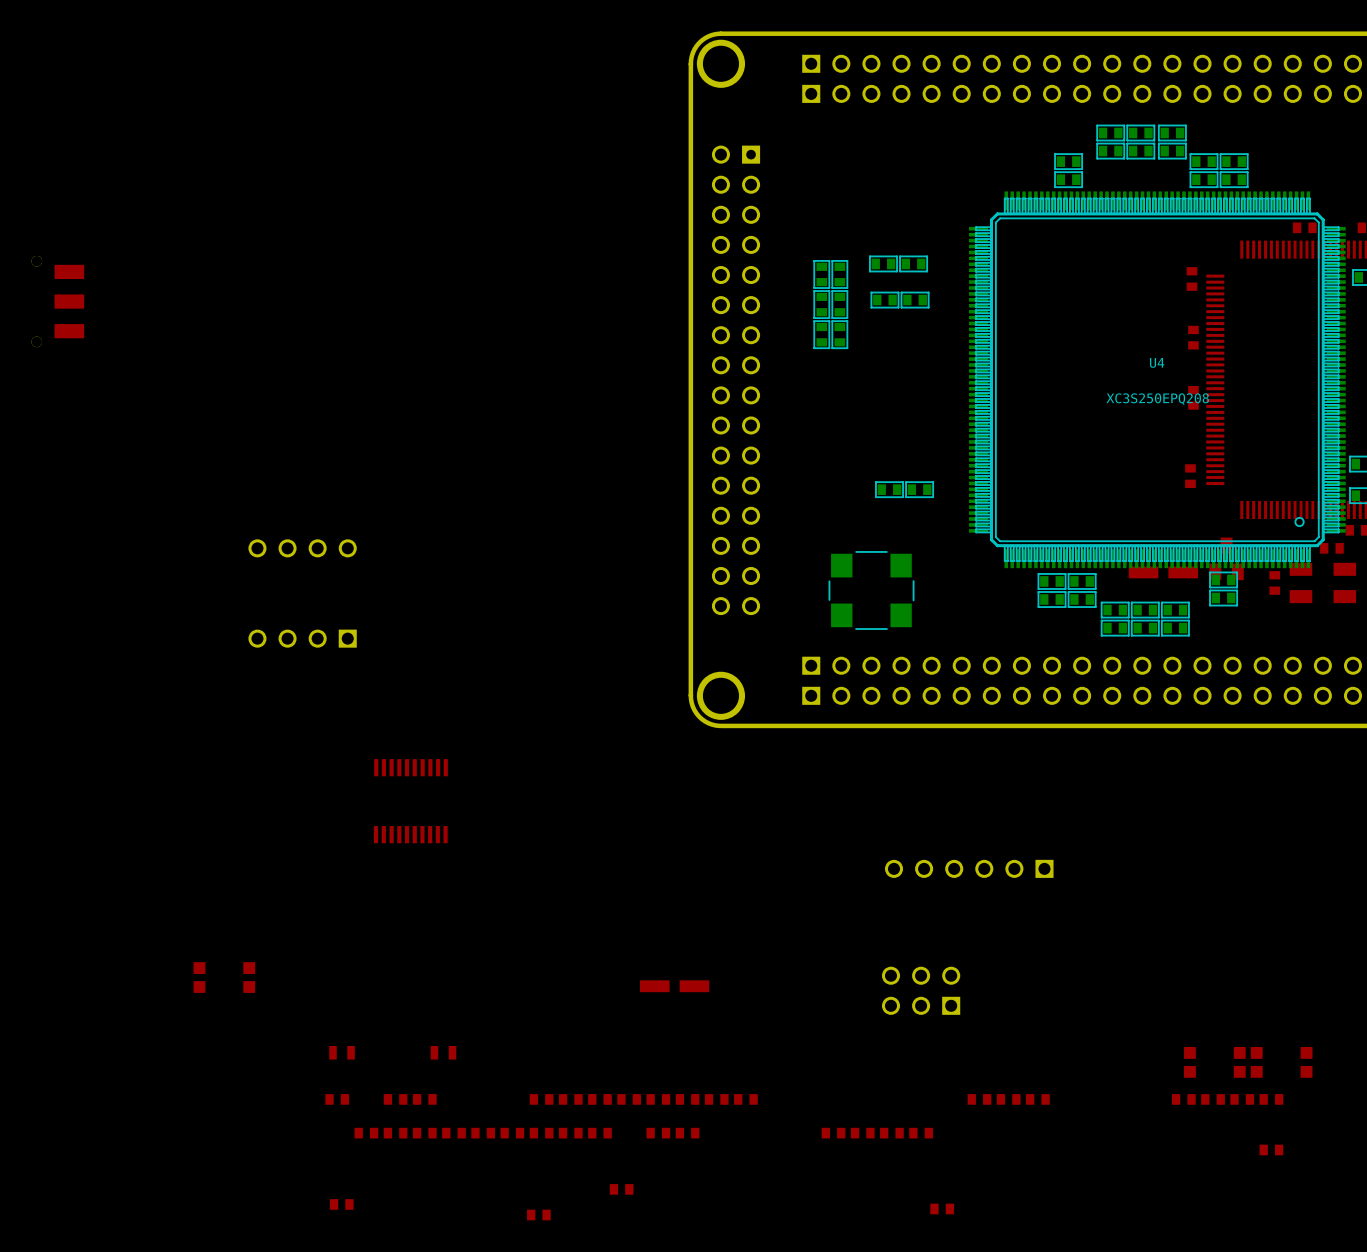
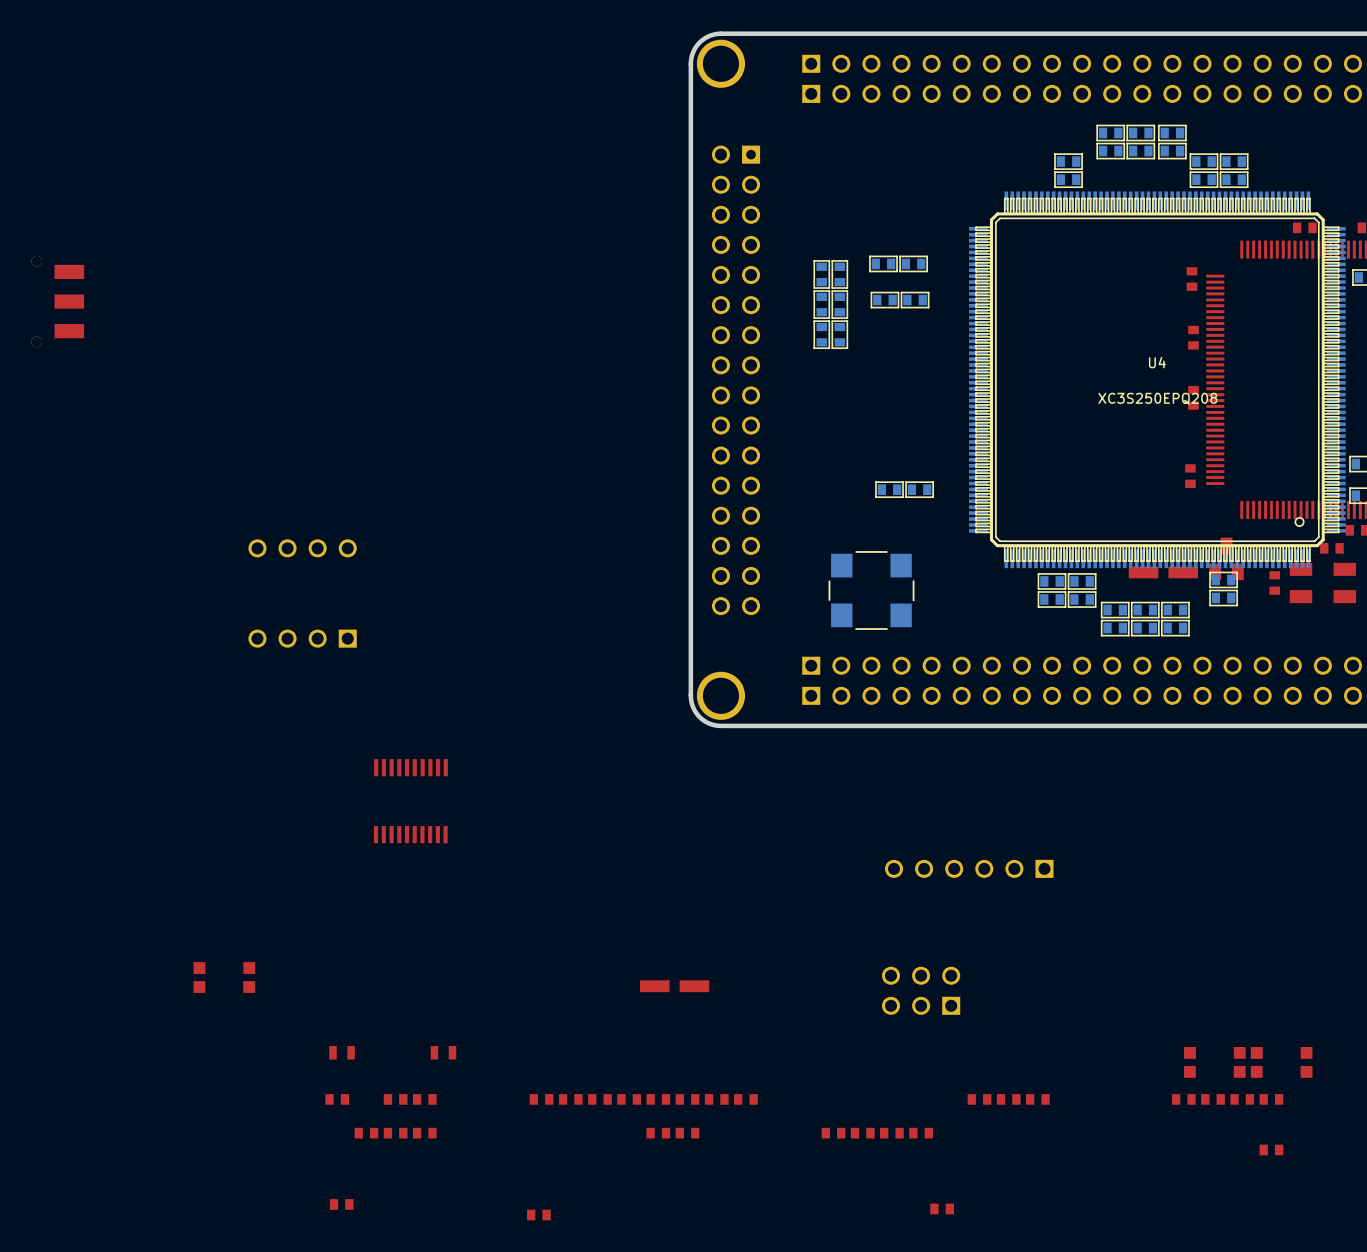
part: (454, 1133) -> none
part: (483, 1133) -> none
part: (512, 1133) -> none
part: (541, 1133) -> none
part: (570, 1133) -> none
part: (599, 1133) -> none
part: (621, 1189) -> none

